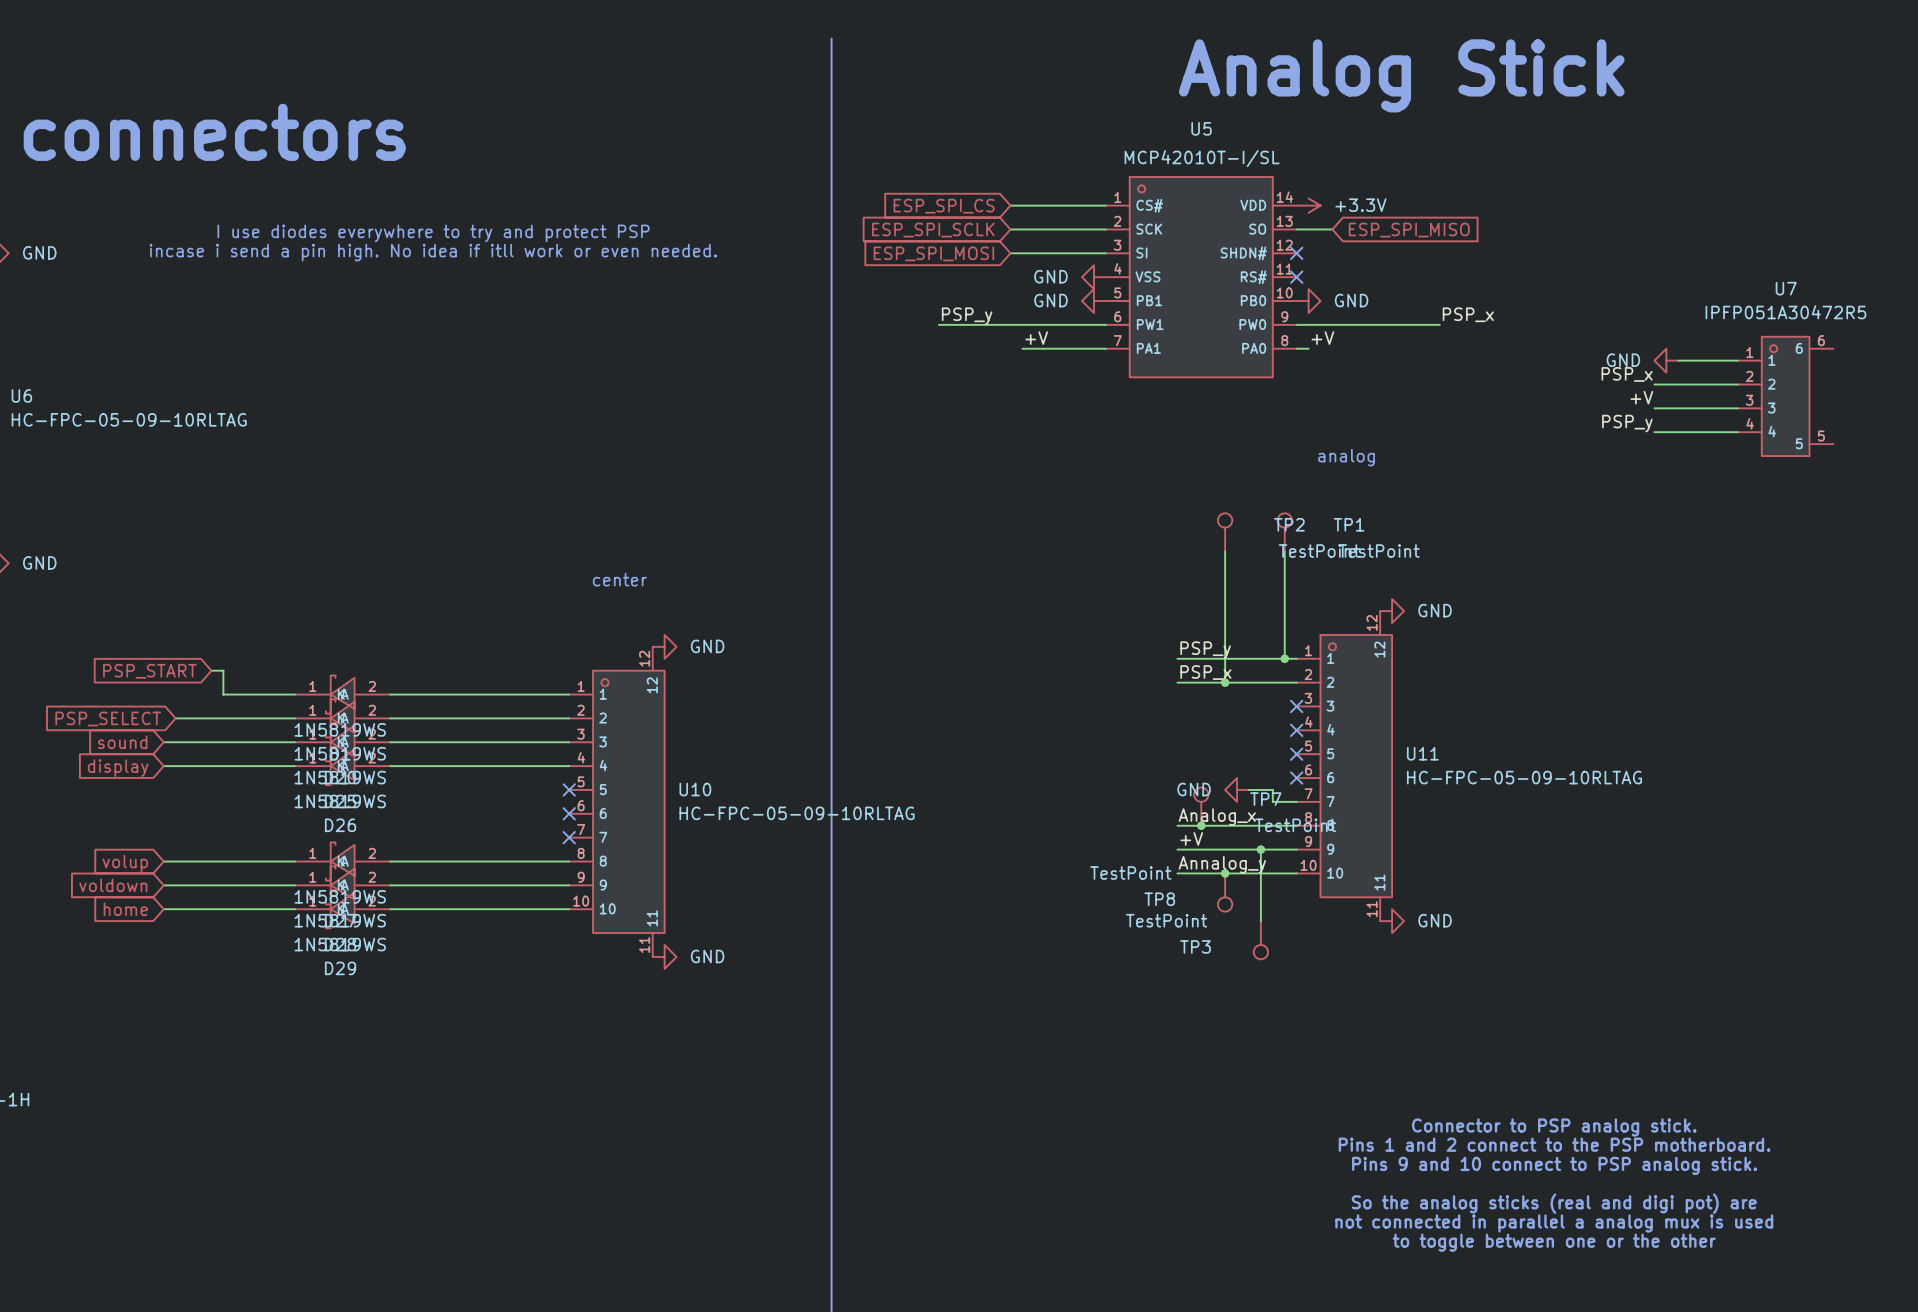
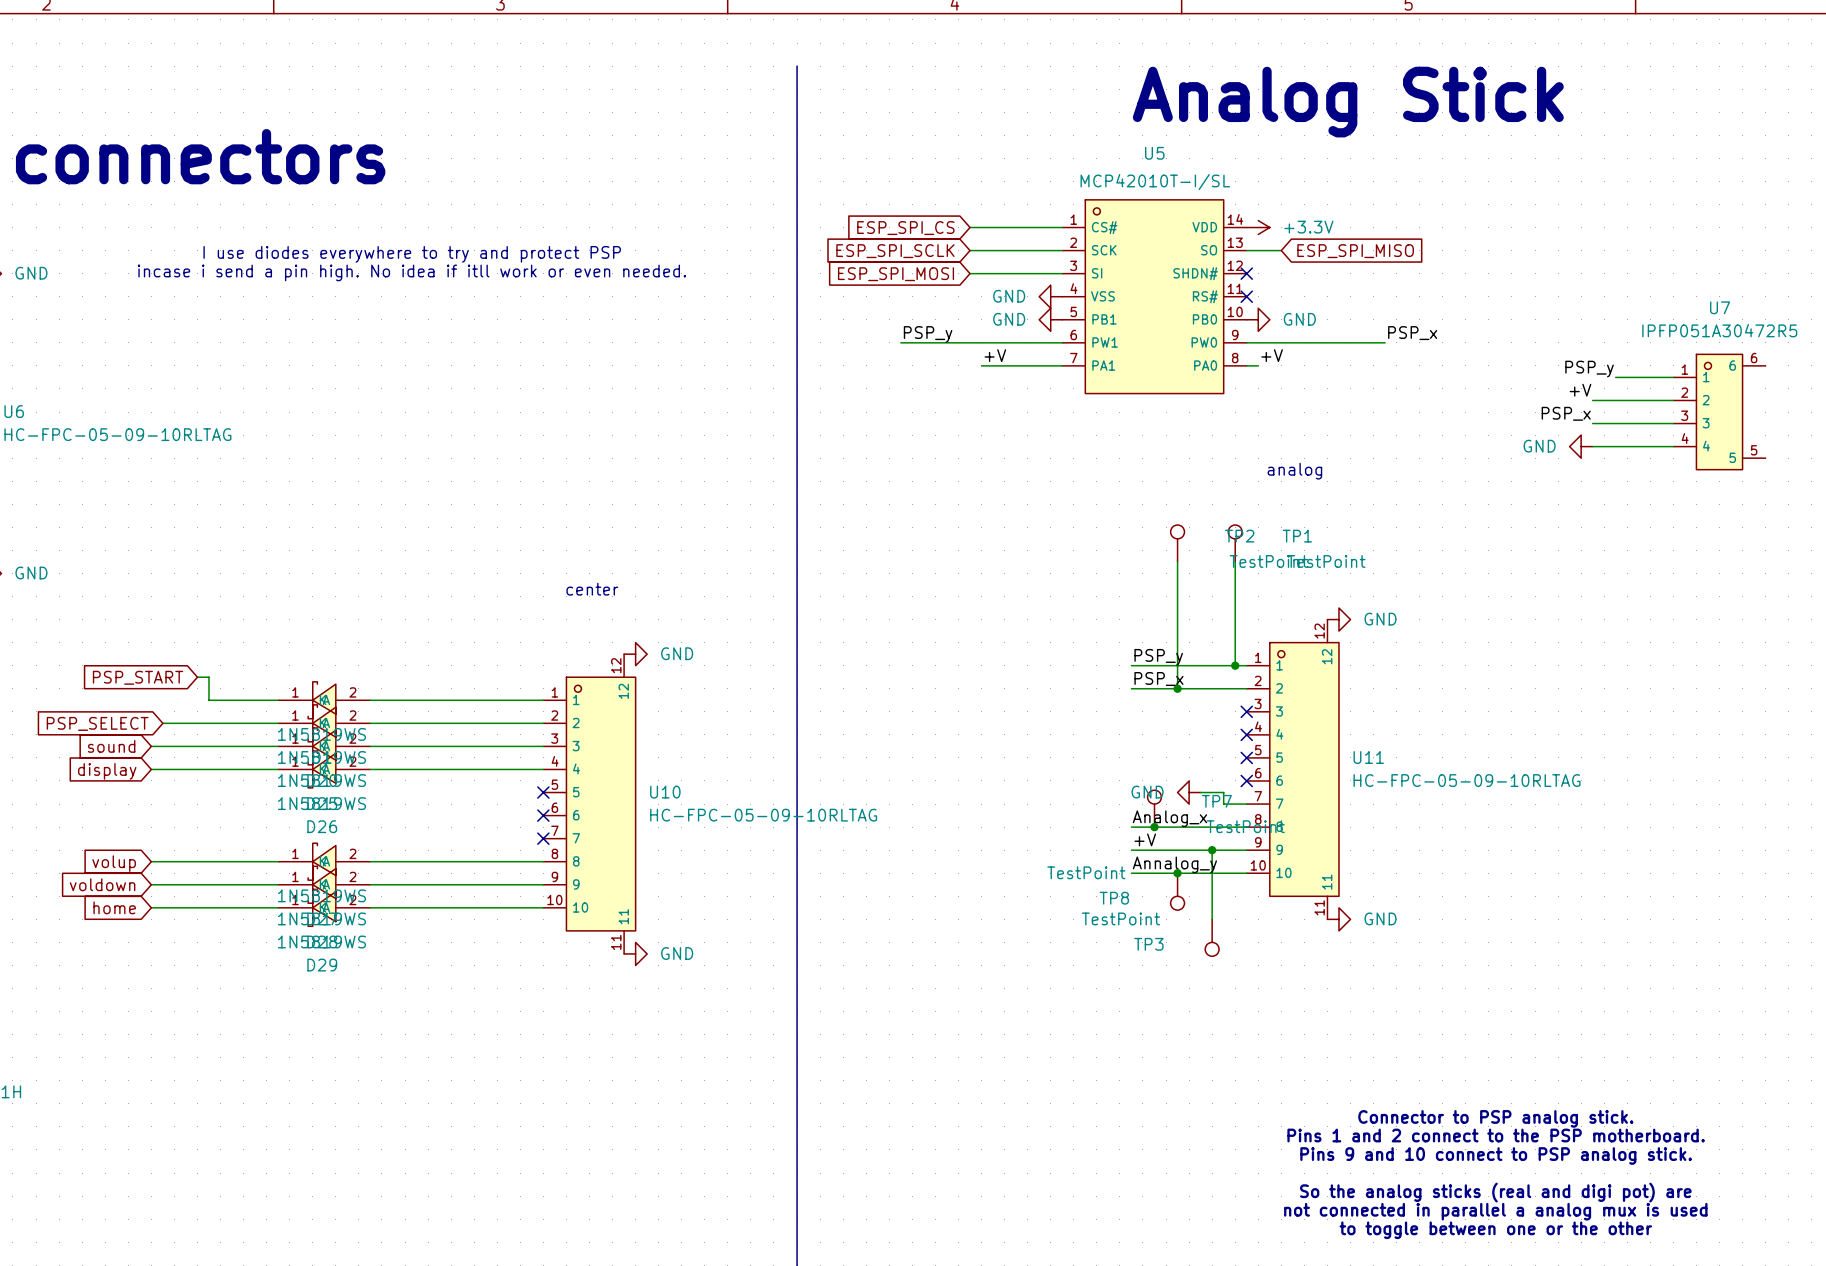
power symbol position: GND (1666, 360) -> GND (1581, 446)
label: PSP_x (1627, 374) -> +V (1580, 390)
label: +V (1641, 397) -> PSP_x (1566, 413)
label position: PSP_y (1627, 423) -> PSP_y (1589, 369)

